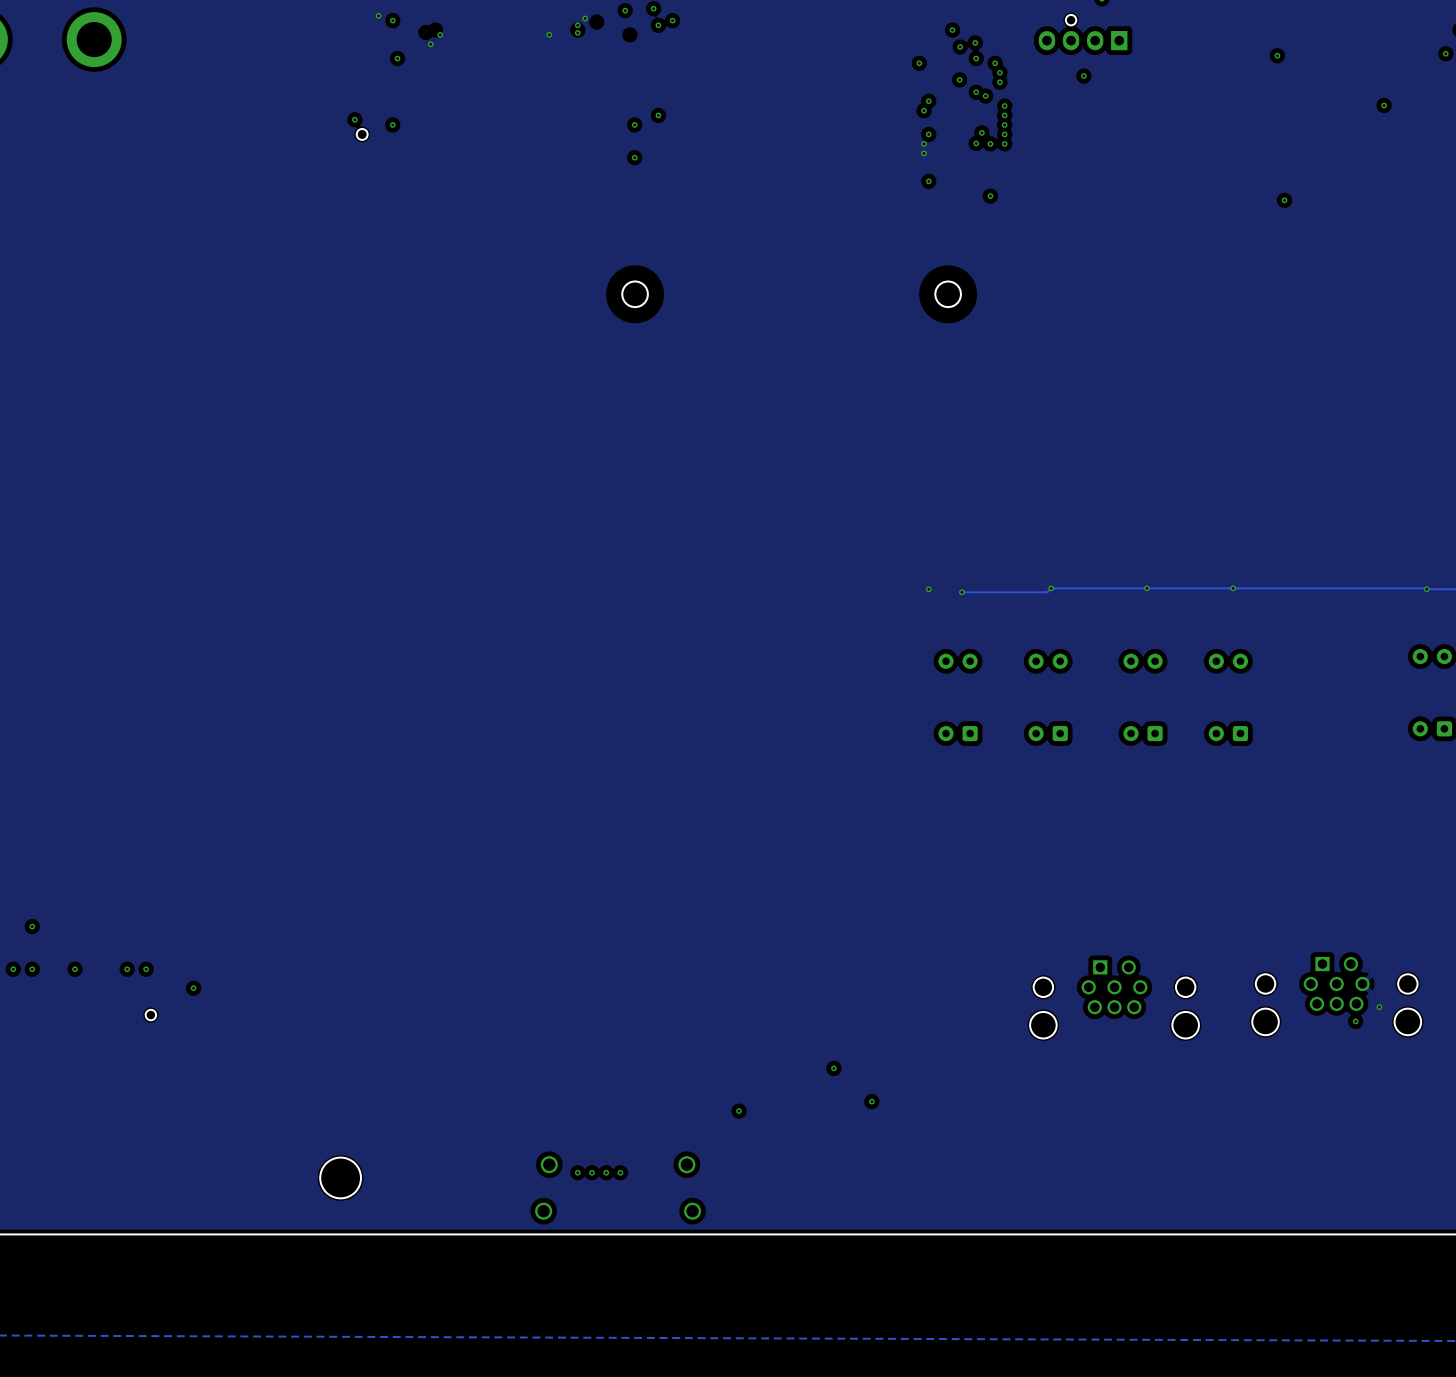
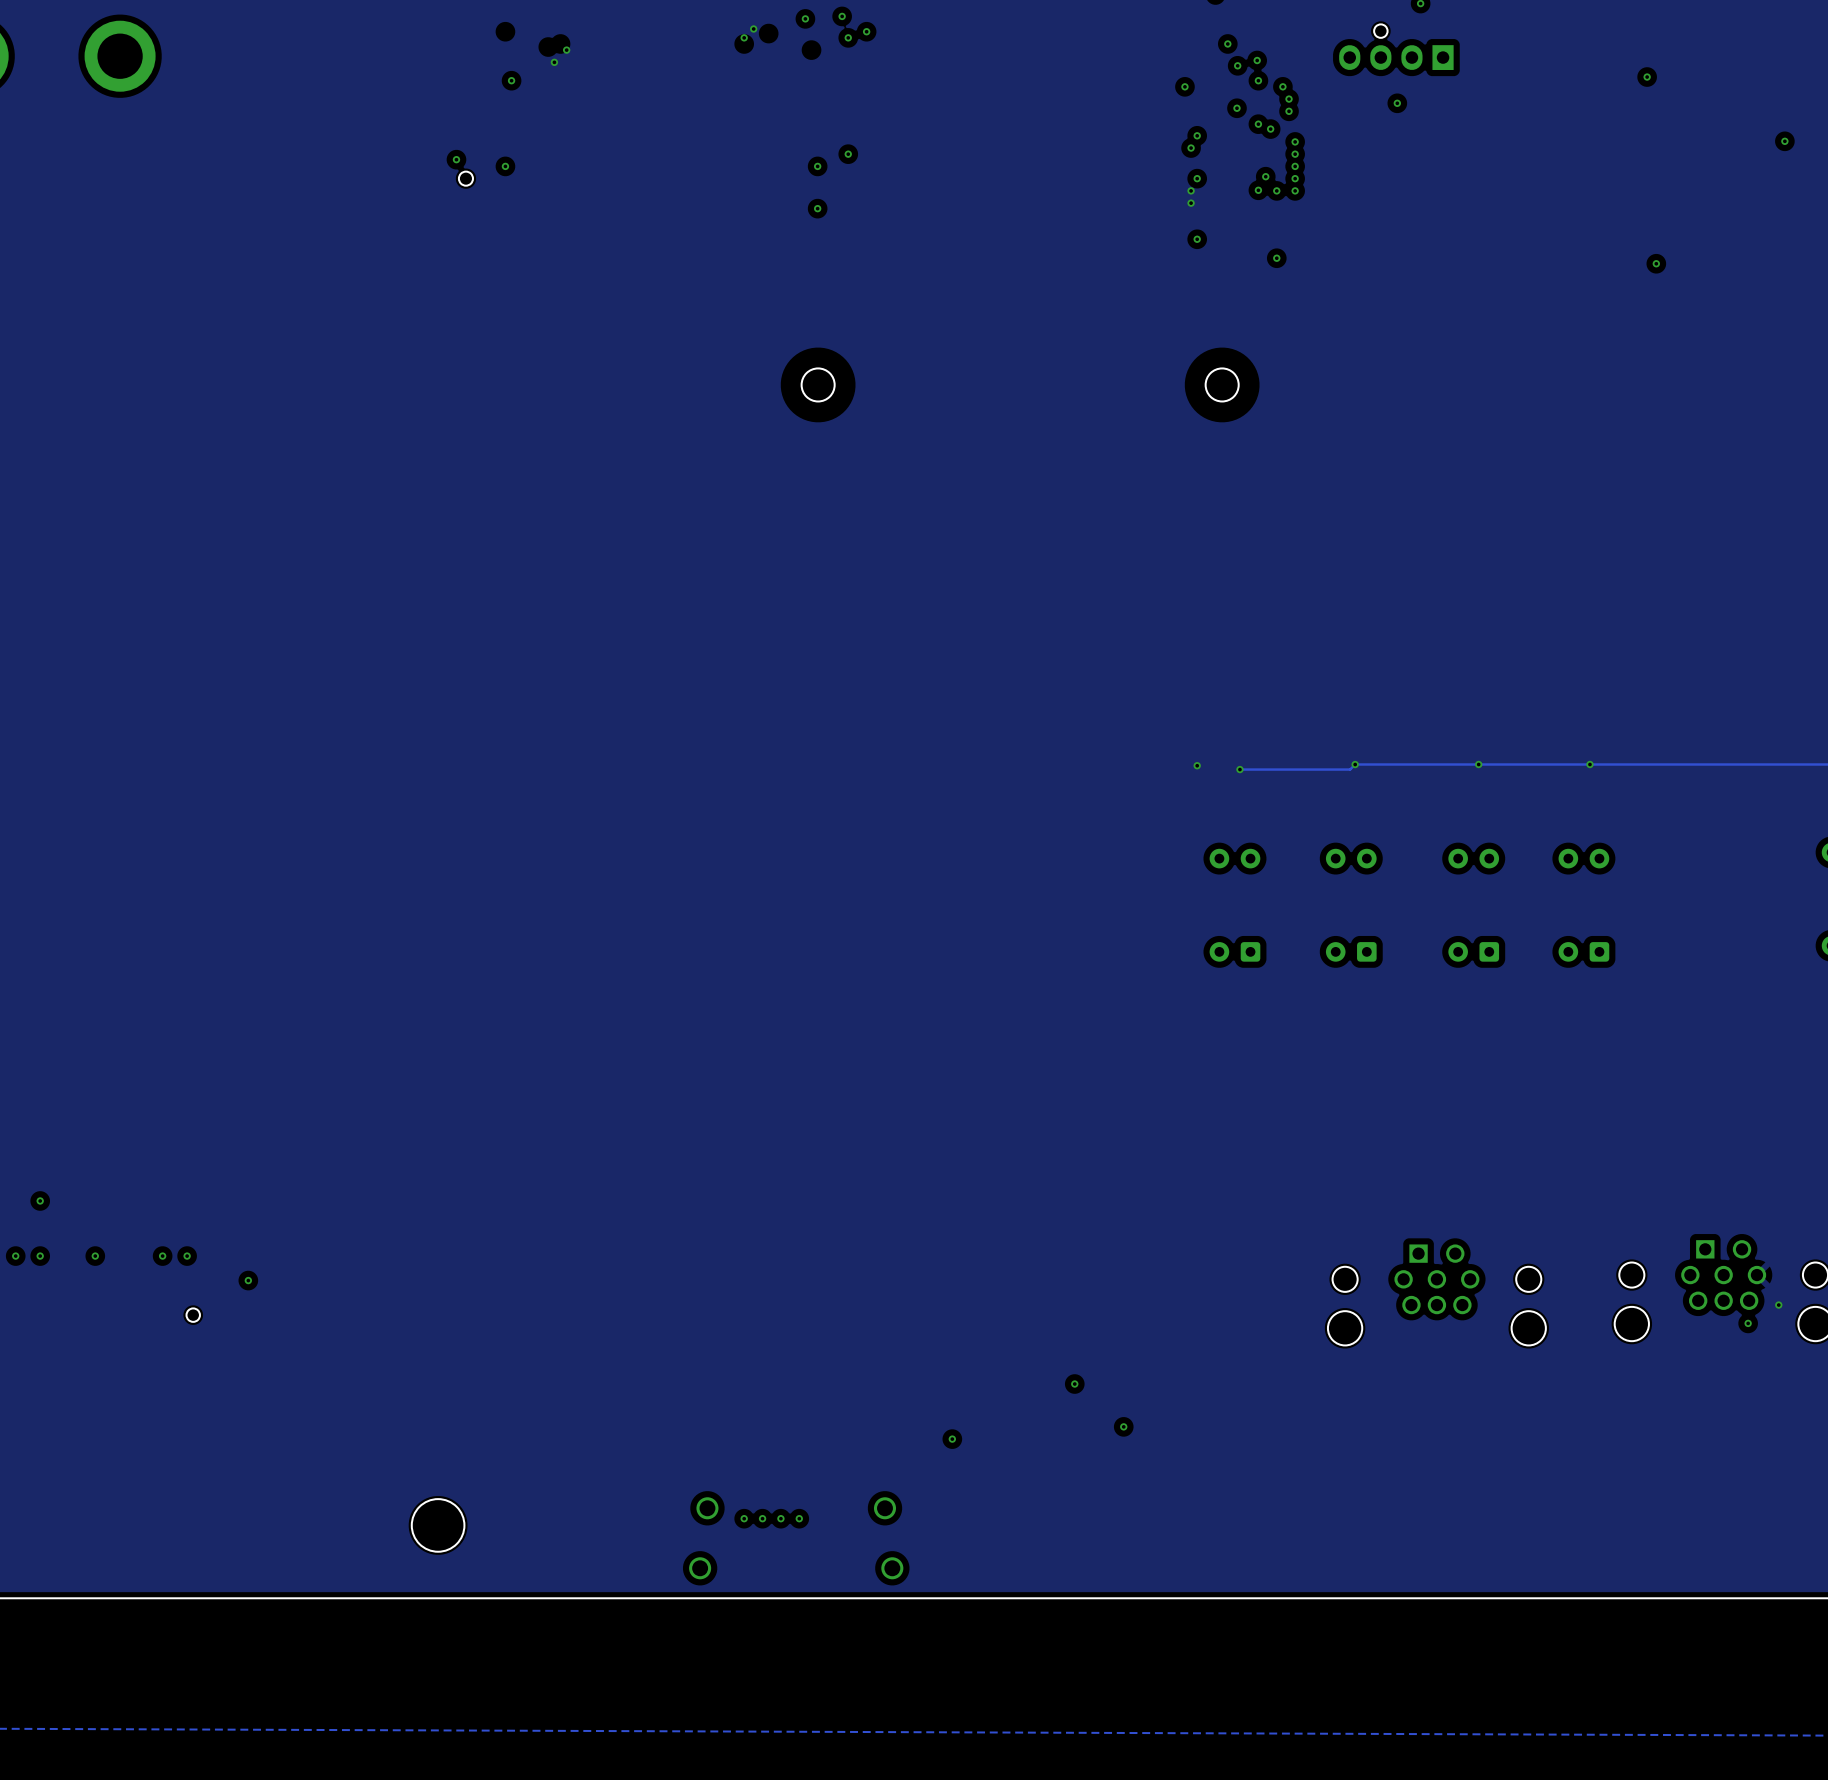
via: (378, 15) -> none
via: (392, 20) -> none
via: (577, 32) -> none
via: (549, 34) -> none

